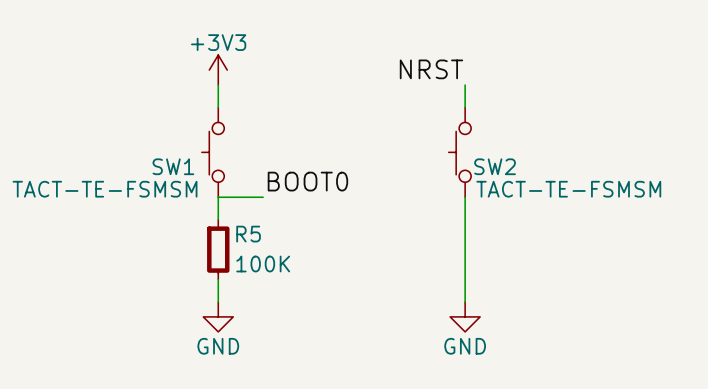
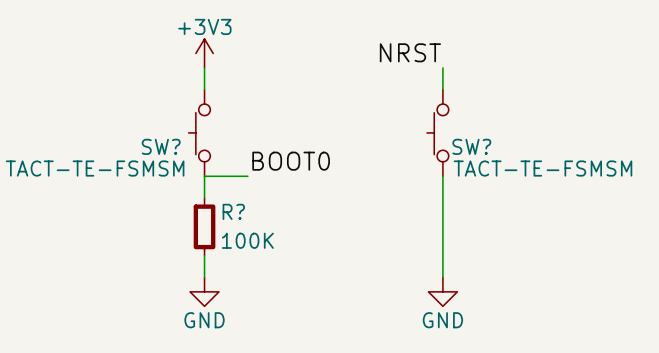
SW1 name: SW1 (173, 166) -> SW? (161, 146)
SW2 name: SW2 (495, 166) -> SW? (471, 146)
R5 name: R5 (248, 234) -> R? (233, 211)

